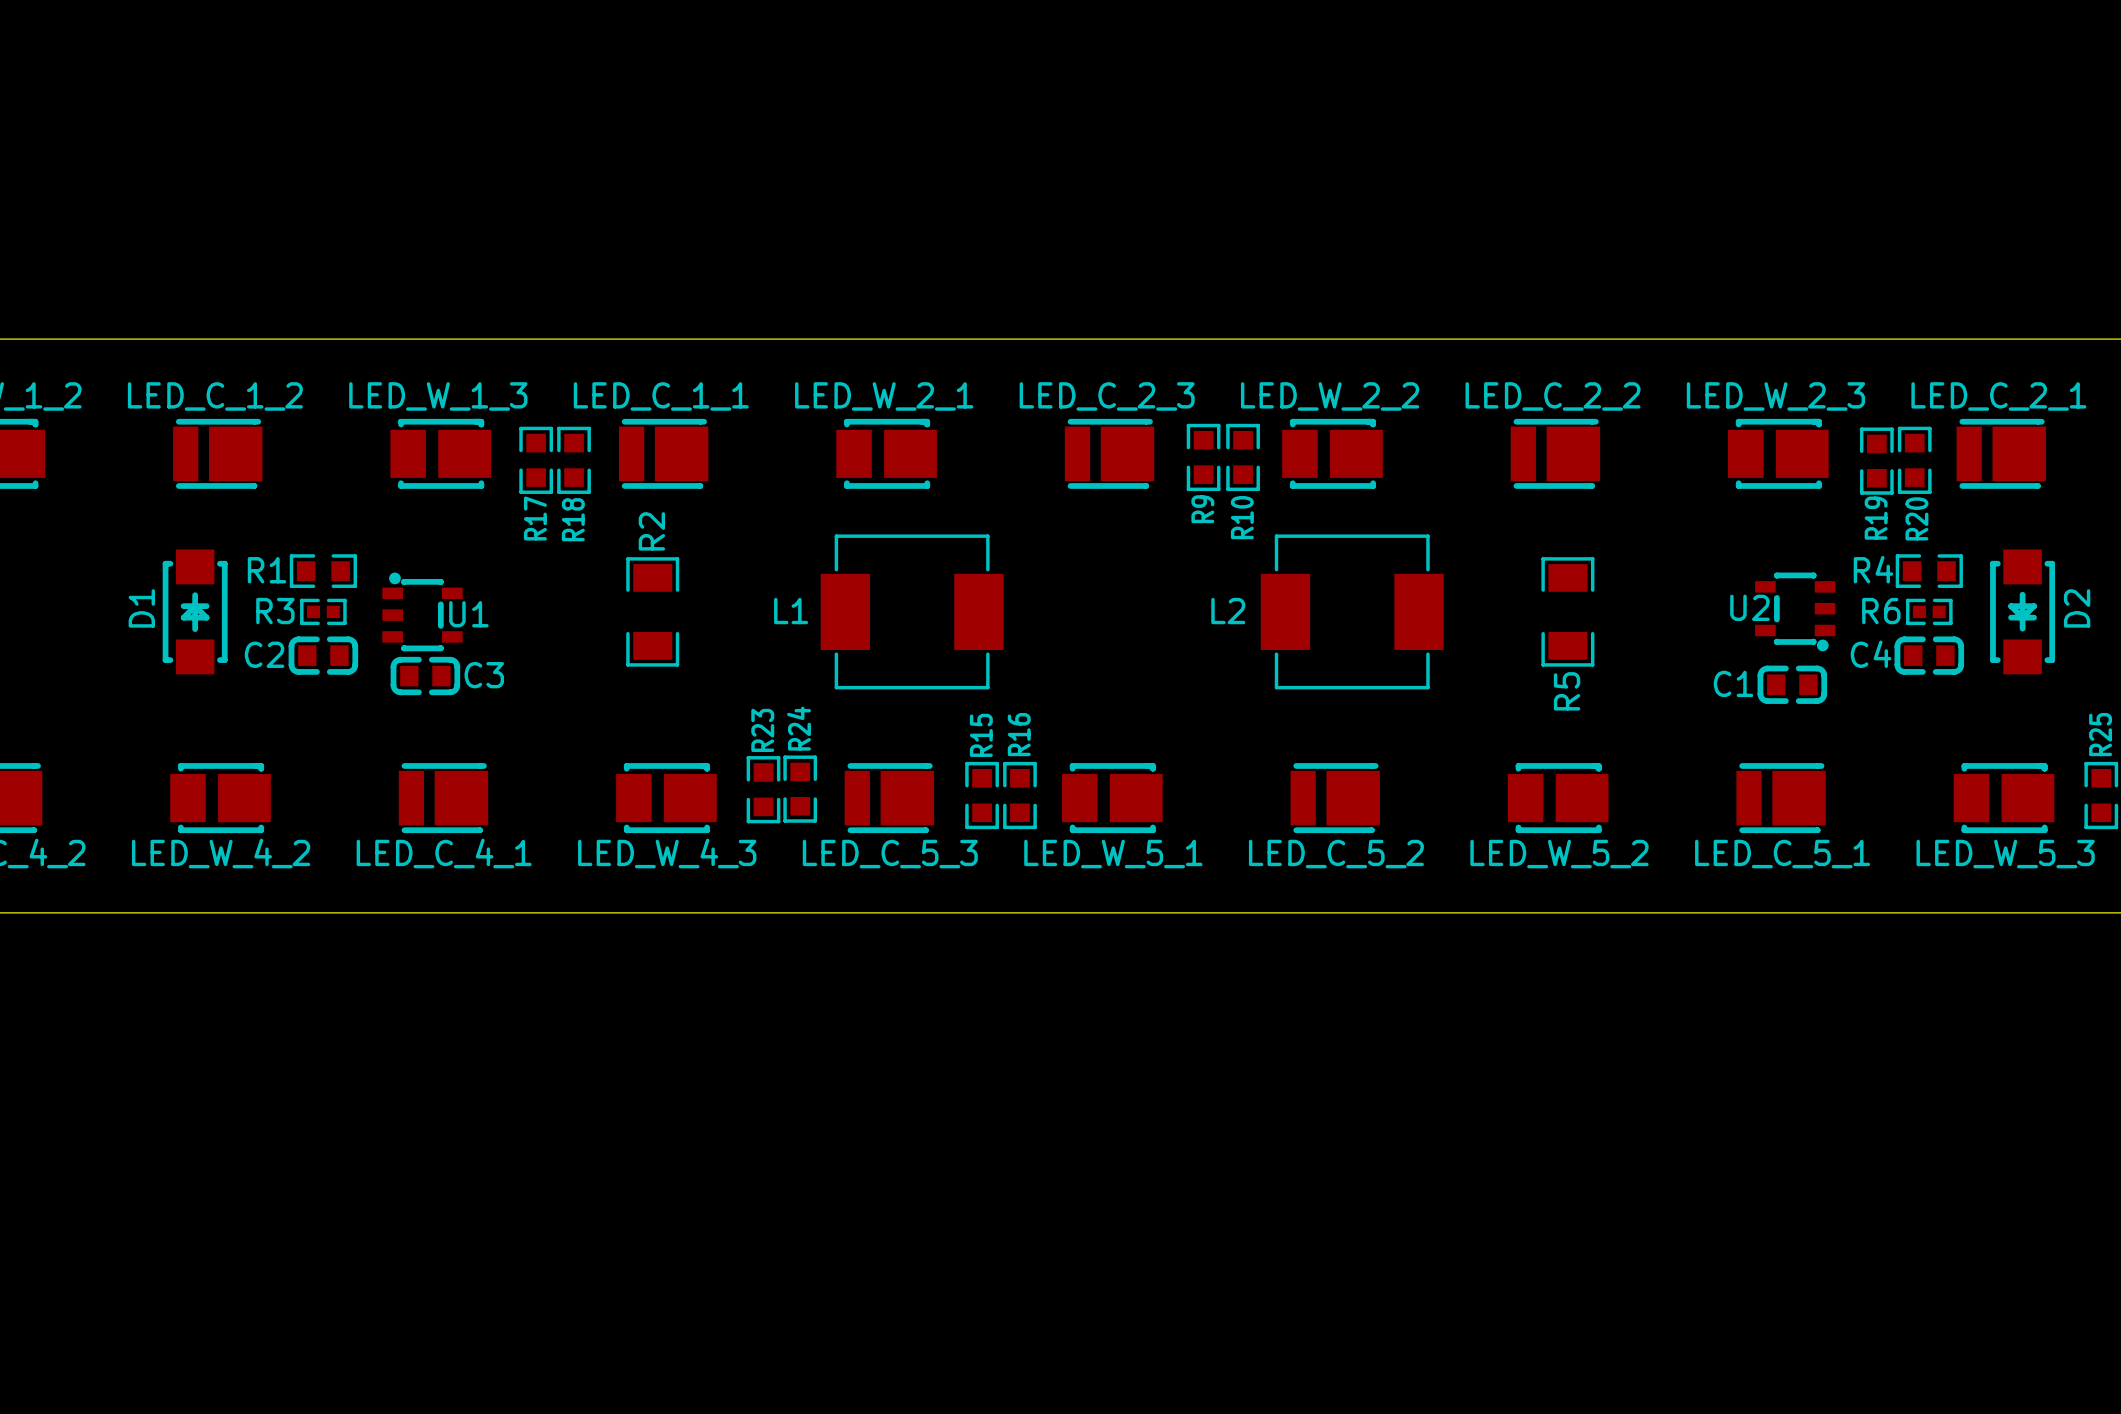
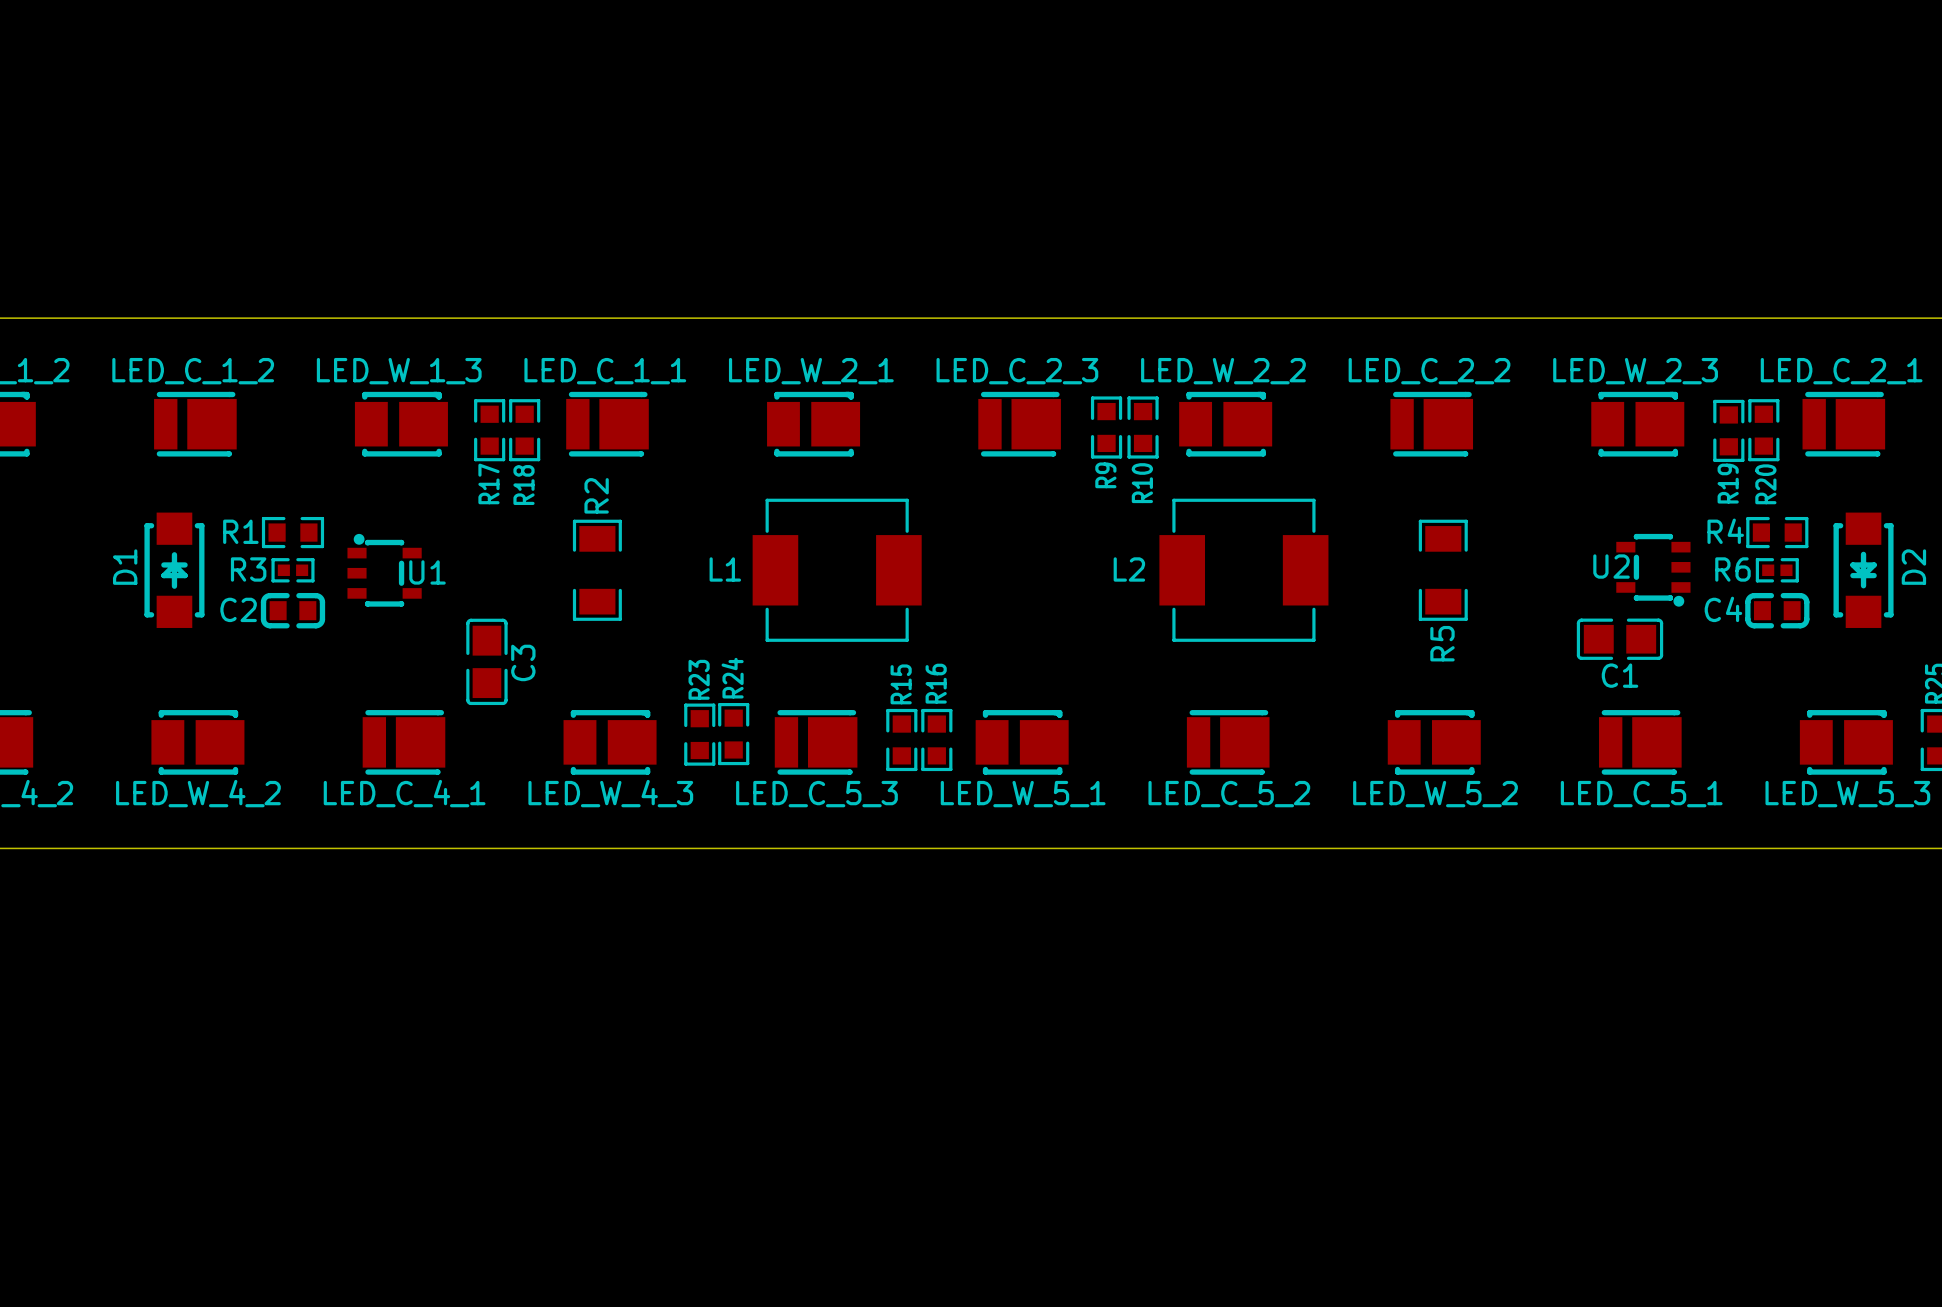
C3 footprint: [390, 656, 461, 696] -> [466, 618, 508, 706]
C1 footprint: [1757, 665, 1828, 704] -> [1576, 618, 1664, 660]
C1 name position: C1 (1733, 683) -> C1 (1620, 675)

